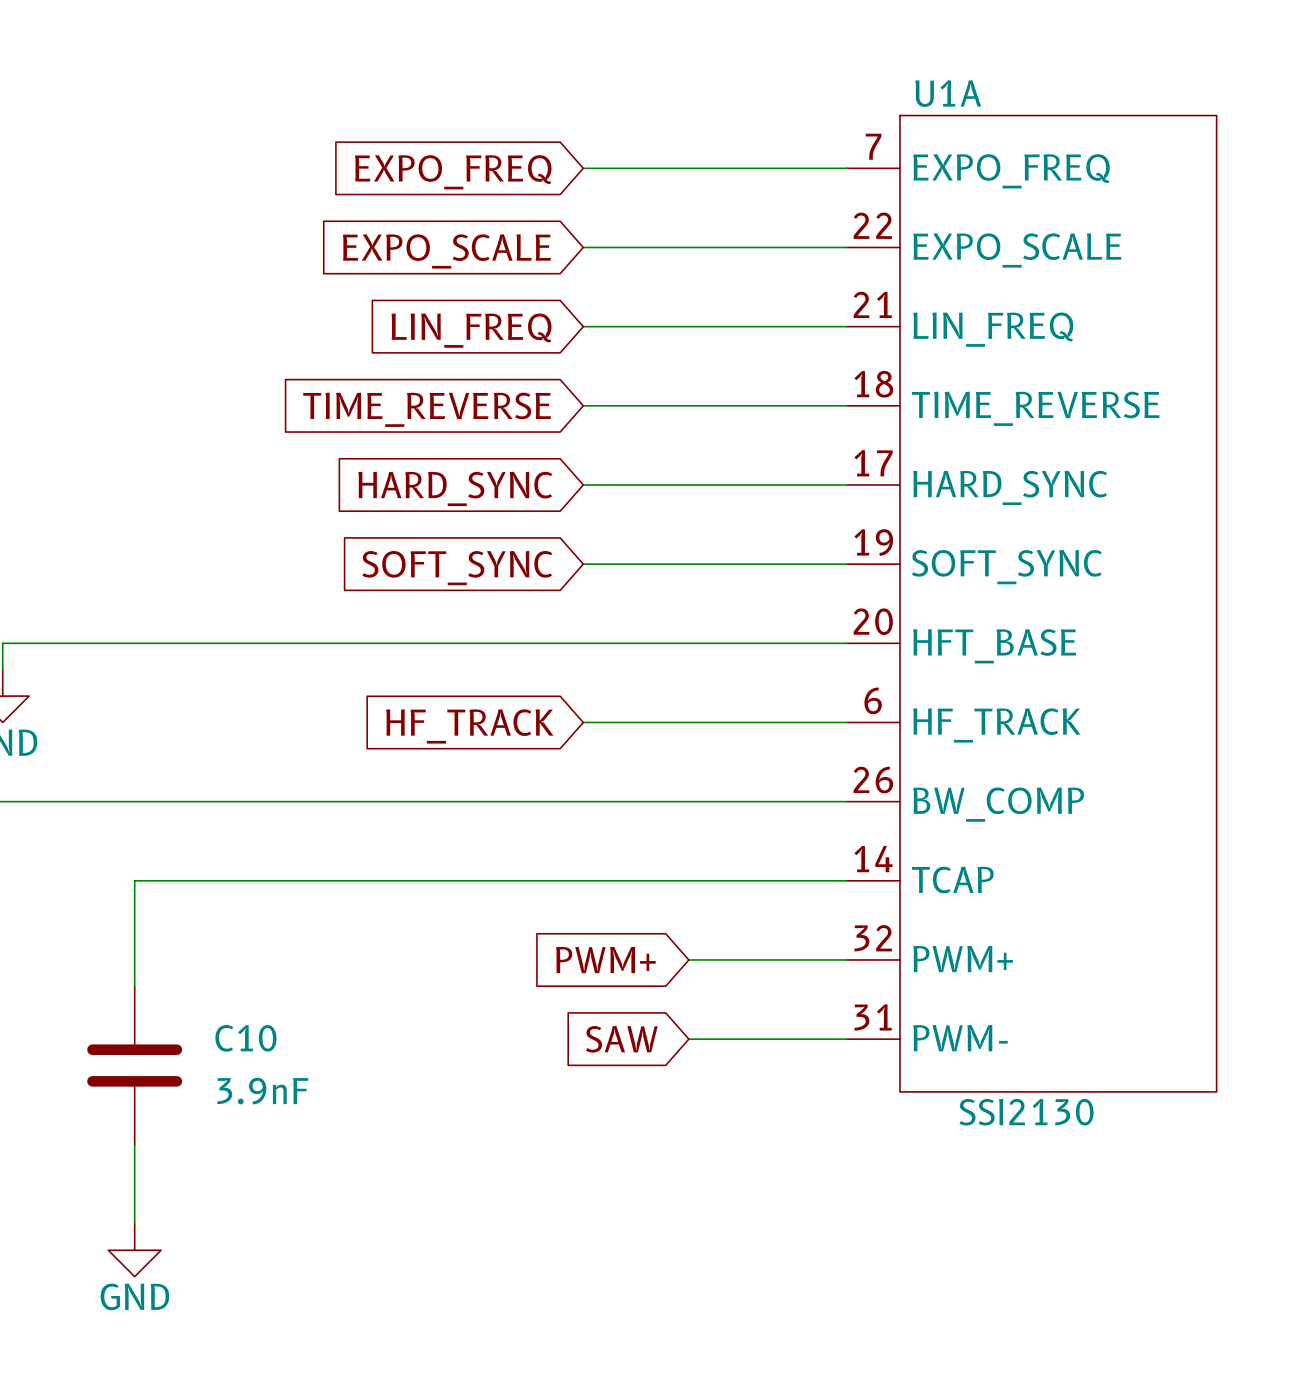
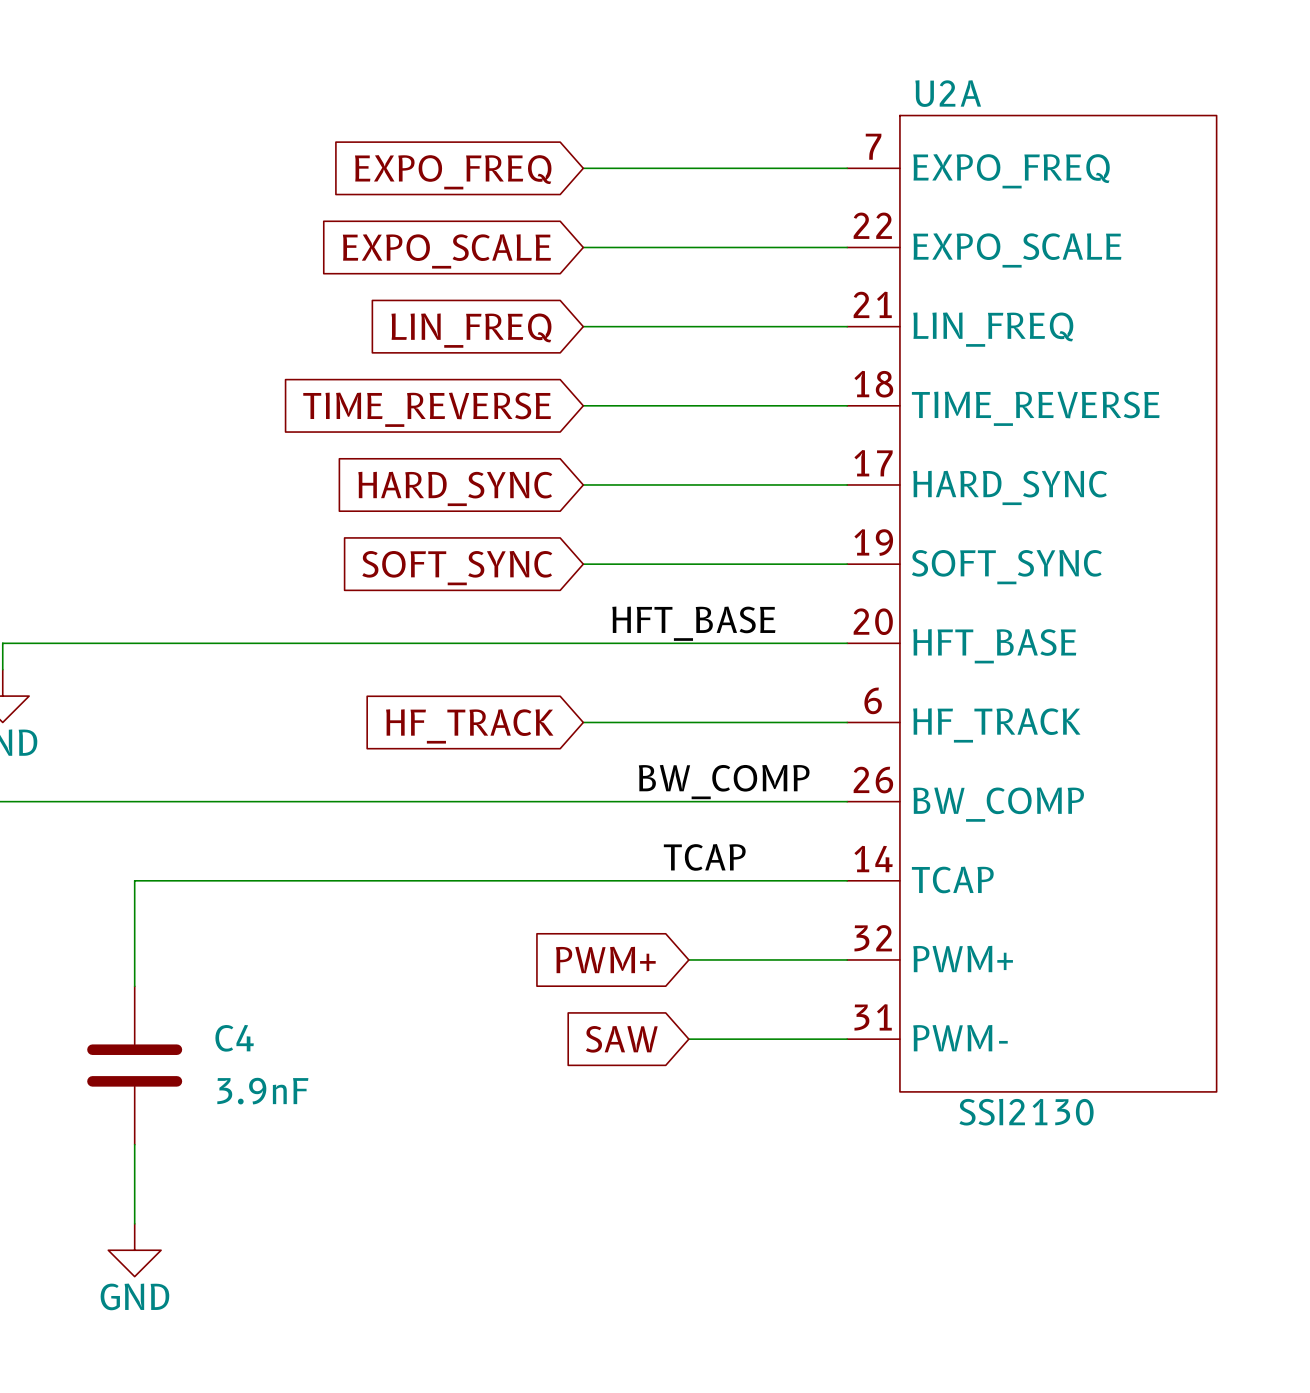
U1A name: U1A (948, 93) -> U2A (948, 93)
label: none -> HFT_BASE (693, 623)
label: none -> BW_COMP (724, 782)
label: none -> TCAP (704, 857)
C10 name: C10 (245, 1038) -> C4 (234, 1038)

